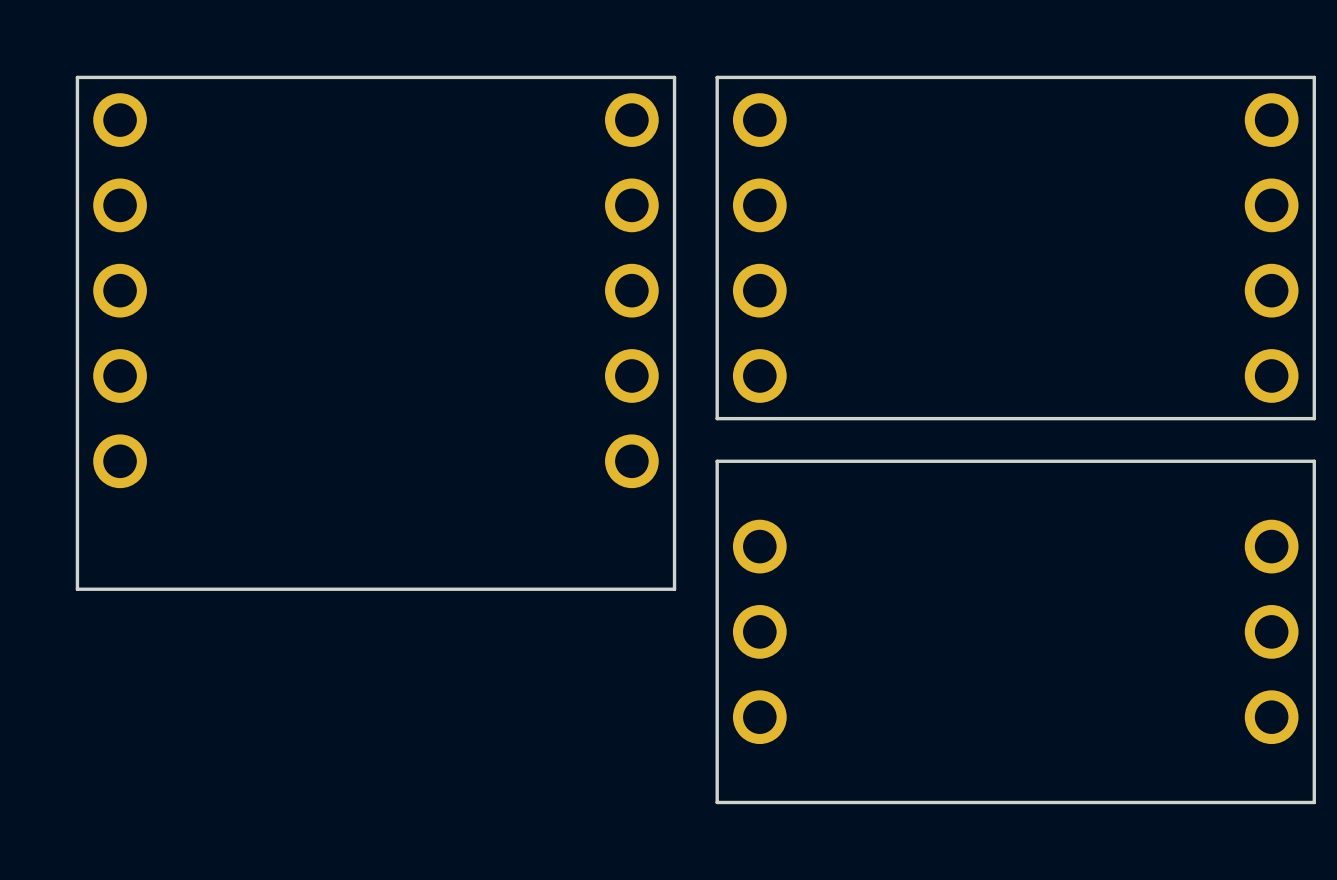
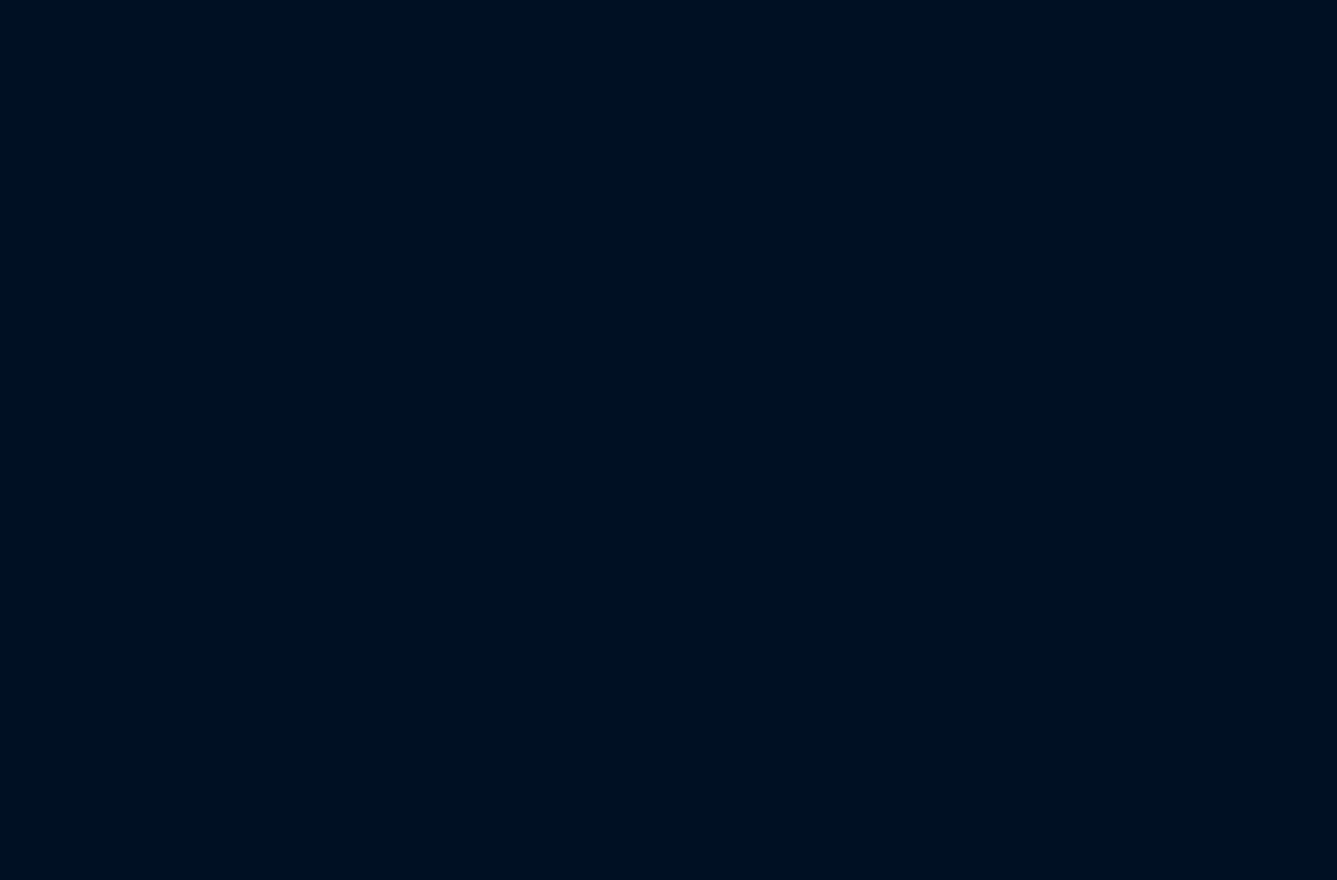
board edge: (674, 77) (77, 77) (77, 589) (674, 589) (674, 77) -> none
board edge: (1314, 77) (717, 77) (717, 418) (1314, 418) (1314, 77) -> none
part: (120, 120) -> none
part: (631, 120) -> none
part: (759, 120) -> none
part: (1271, 120) -> none
part: (120, 205) -> none
part: (631, 205) -> none
part: (759, 205) -> none
part: (1271, 205) -> none
part: (120, 290) -> none
part: (631, 290) -> none
part: (759, 290) -> none
part: (1271, 290) -> none
part: (120, 375) -> none
part: (631, 375) -> none
part: (759, 375) -> none
part: (1271, 375) -> none
part: (120, 461) -> none
part: (631, 461) -> none
board edge: (1314, 461) (717, 461) (717, 802) (1314, 802) (1314, 461) -> none
part: (759, 546) -> none
part: (1271, 546) -> none
part: (759, 631) -> none
part: (1271, 631) -> none
part: (759, 717) -> none
part: (1271, 717) -> none

